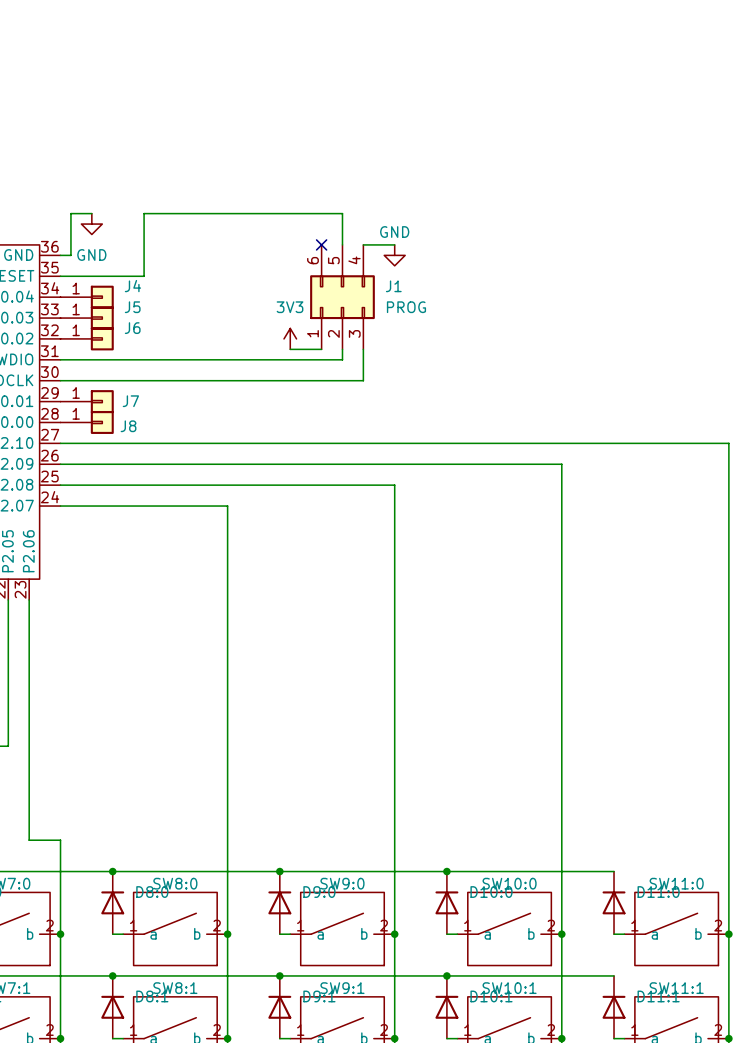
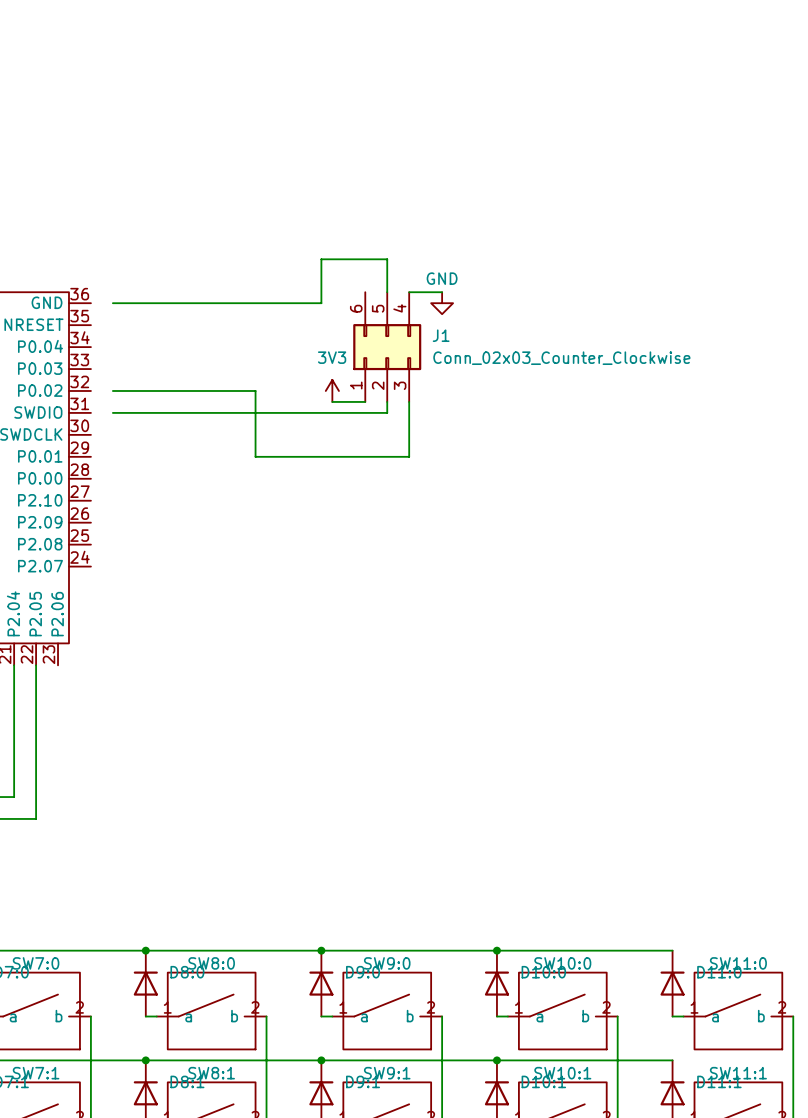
wire: (91, 213) (70, 213) (70, 255) (60, 255) -> none
wire: (279, 213) (144, 213) (144, 276) (60, 276) -> (321, 259) (321, 303) (112, 303)
power symbol: GND (91, 224) -> none
no-connect mark: (321, 244) -> none
J4: (87, 297) -> none
J1 value: PROG (406, 307) -> Conn_02x03_Counter_Clockwise (561, 358)
J5: (87, 318) -> none
J6: (87, 338) -> none
wire: (60, 359) (81, 359) -> none
wire: (60, 380) (363, 380) -> (112, 390) (255, 390) (255, 456) (409, 456) (409, 434)
J7: (87, 401) -> none
J8: (87, 422) -> none
wire: (60, 443) (728, 443) (728, 934) -> none
wire: (60, 464) (561, 464) (561, 934) -> none
wire: (60, 485) (394, 485) (394, 934) -> none
wire: (60, 506) (227, 506) (227, 934) -> none
wire: (29, 600) (29, 840) (60, 840) (60, 934) -> none
junction: (60, 934) -> none
junction: (227, 934) -> none
junction: (394, 934) -> none
junction: (561, 934) -> none
junction: (728, 934) -> none

